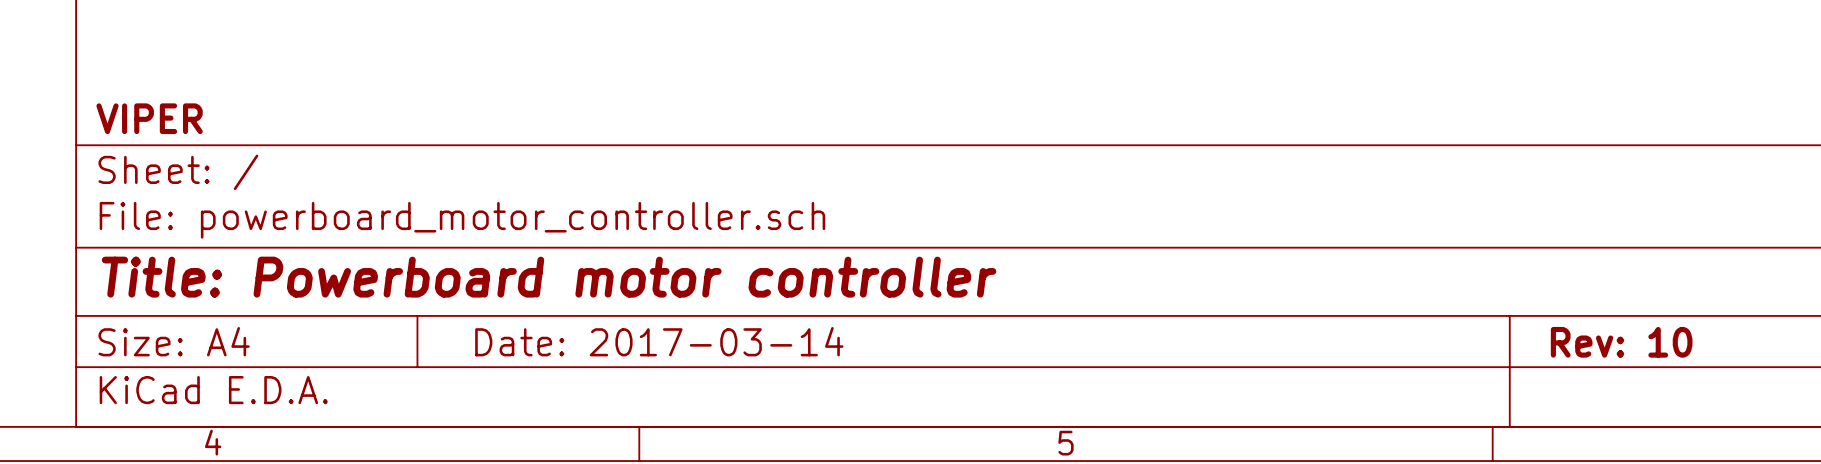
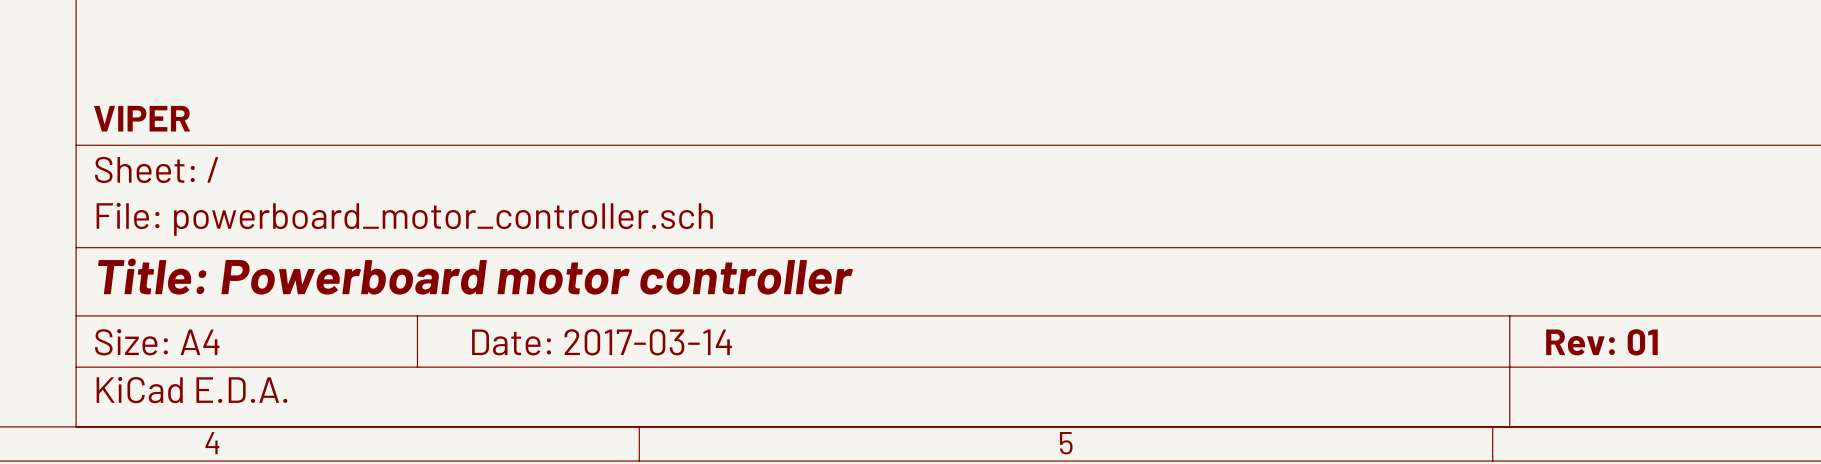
title block: Rev: 10 (1621, 342) -> Rev: 01 (1601, 342)

